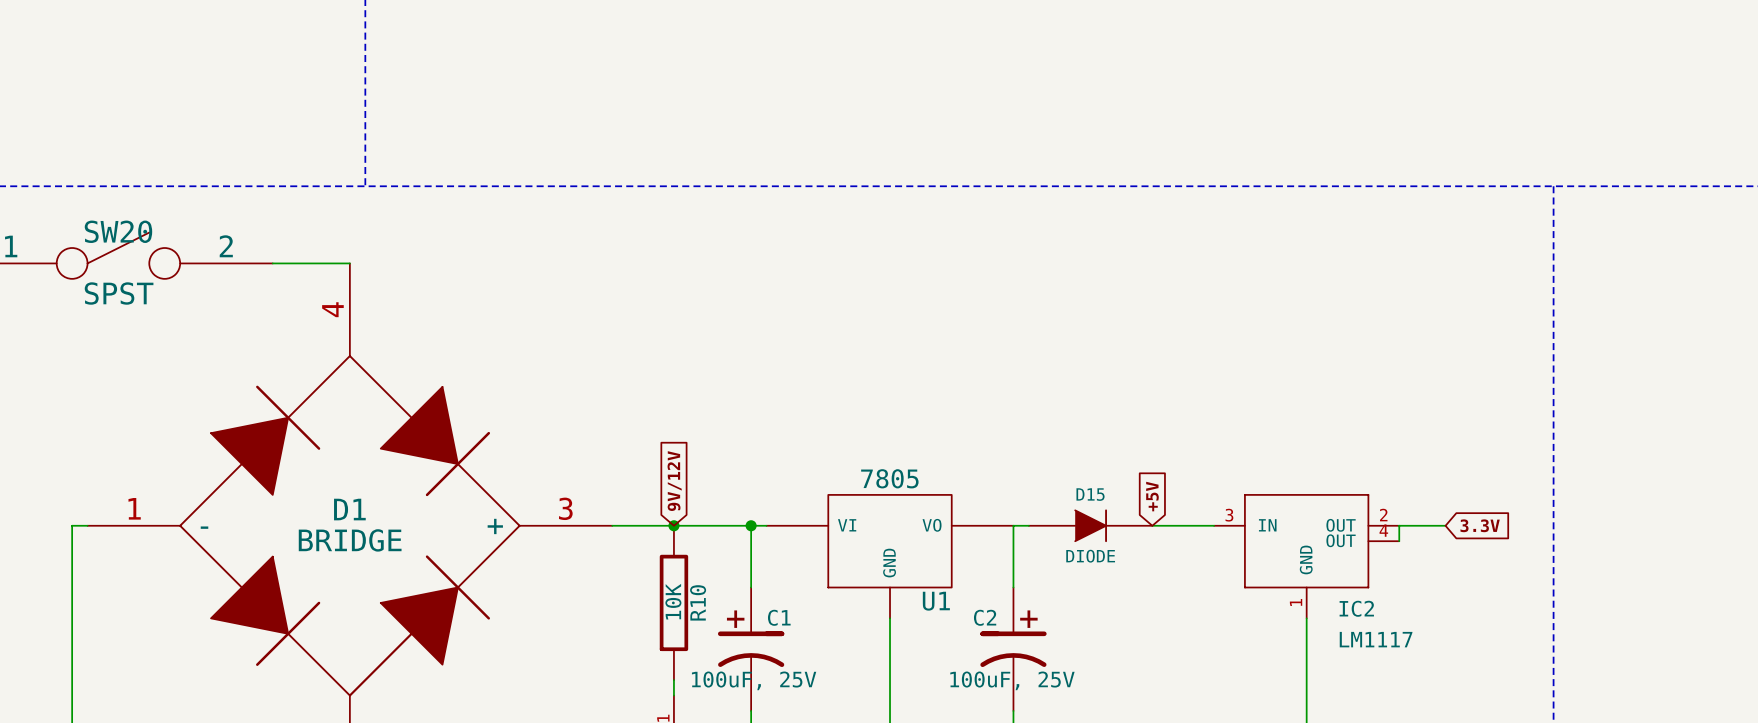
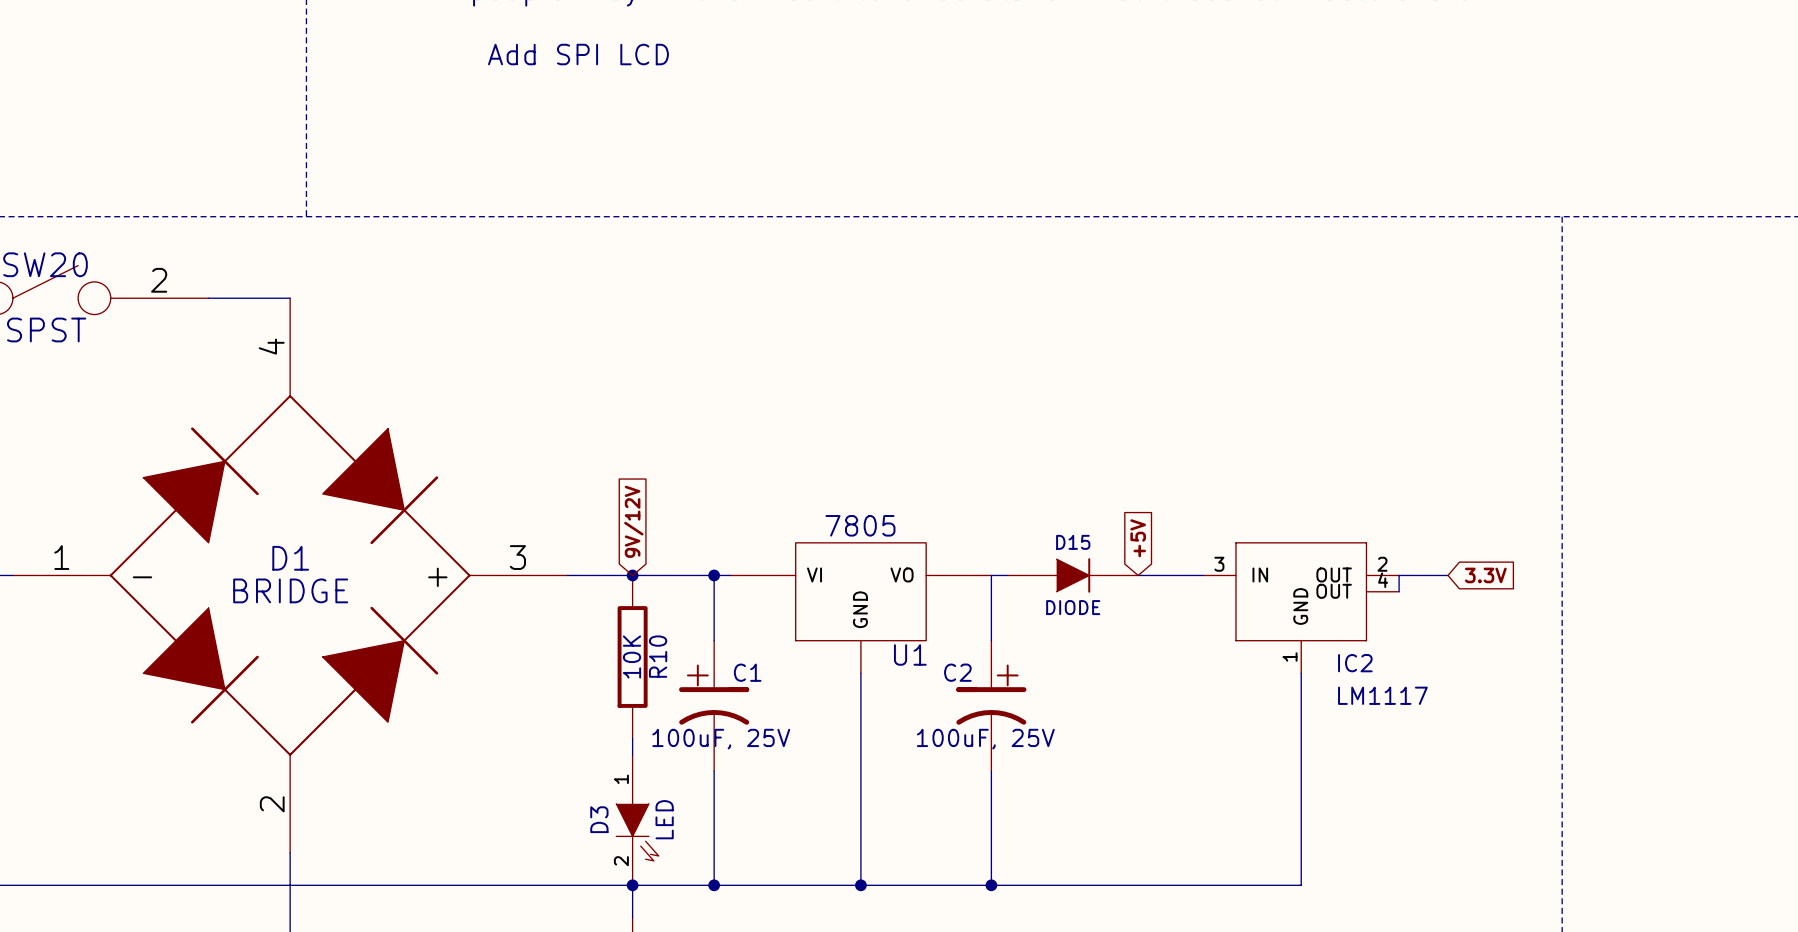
text: none -> Add SPI LCD (578, 54)

